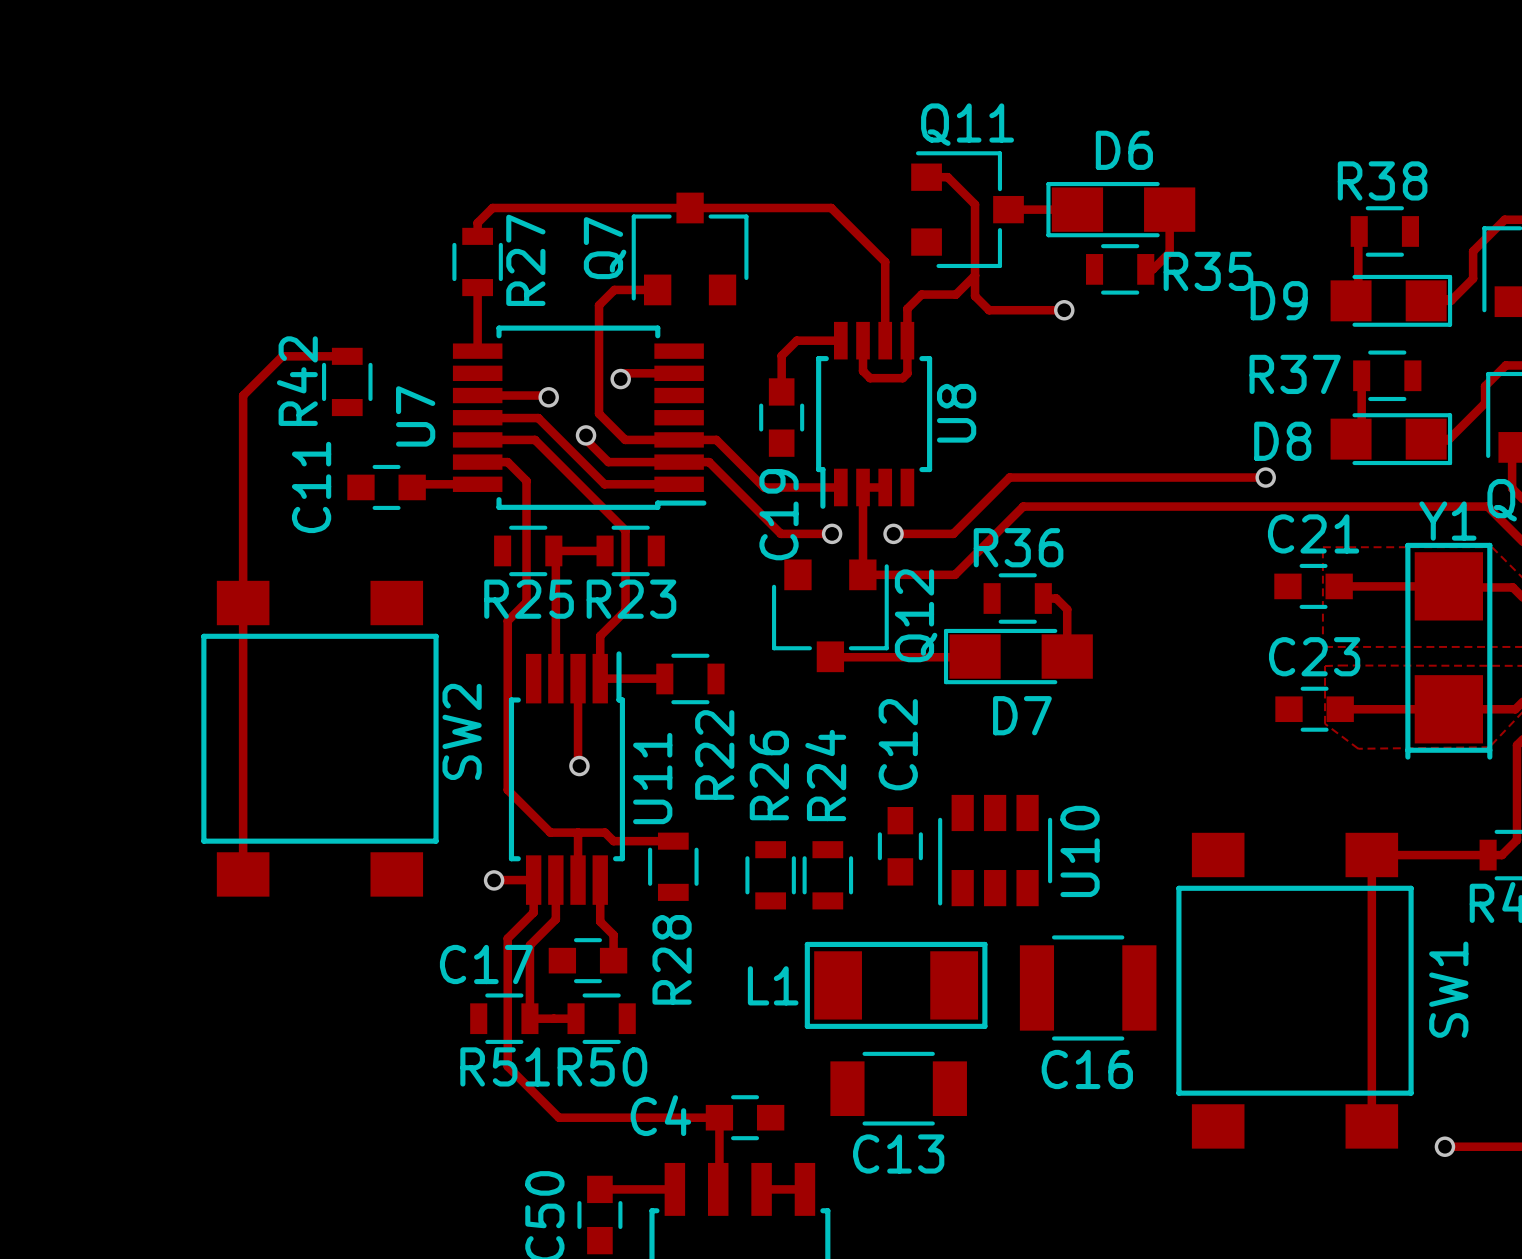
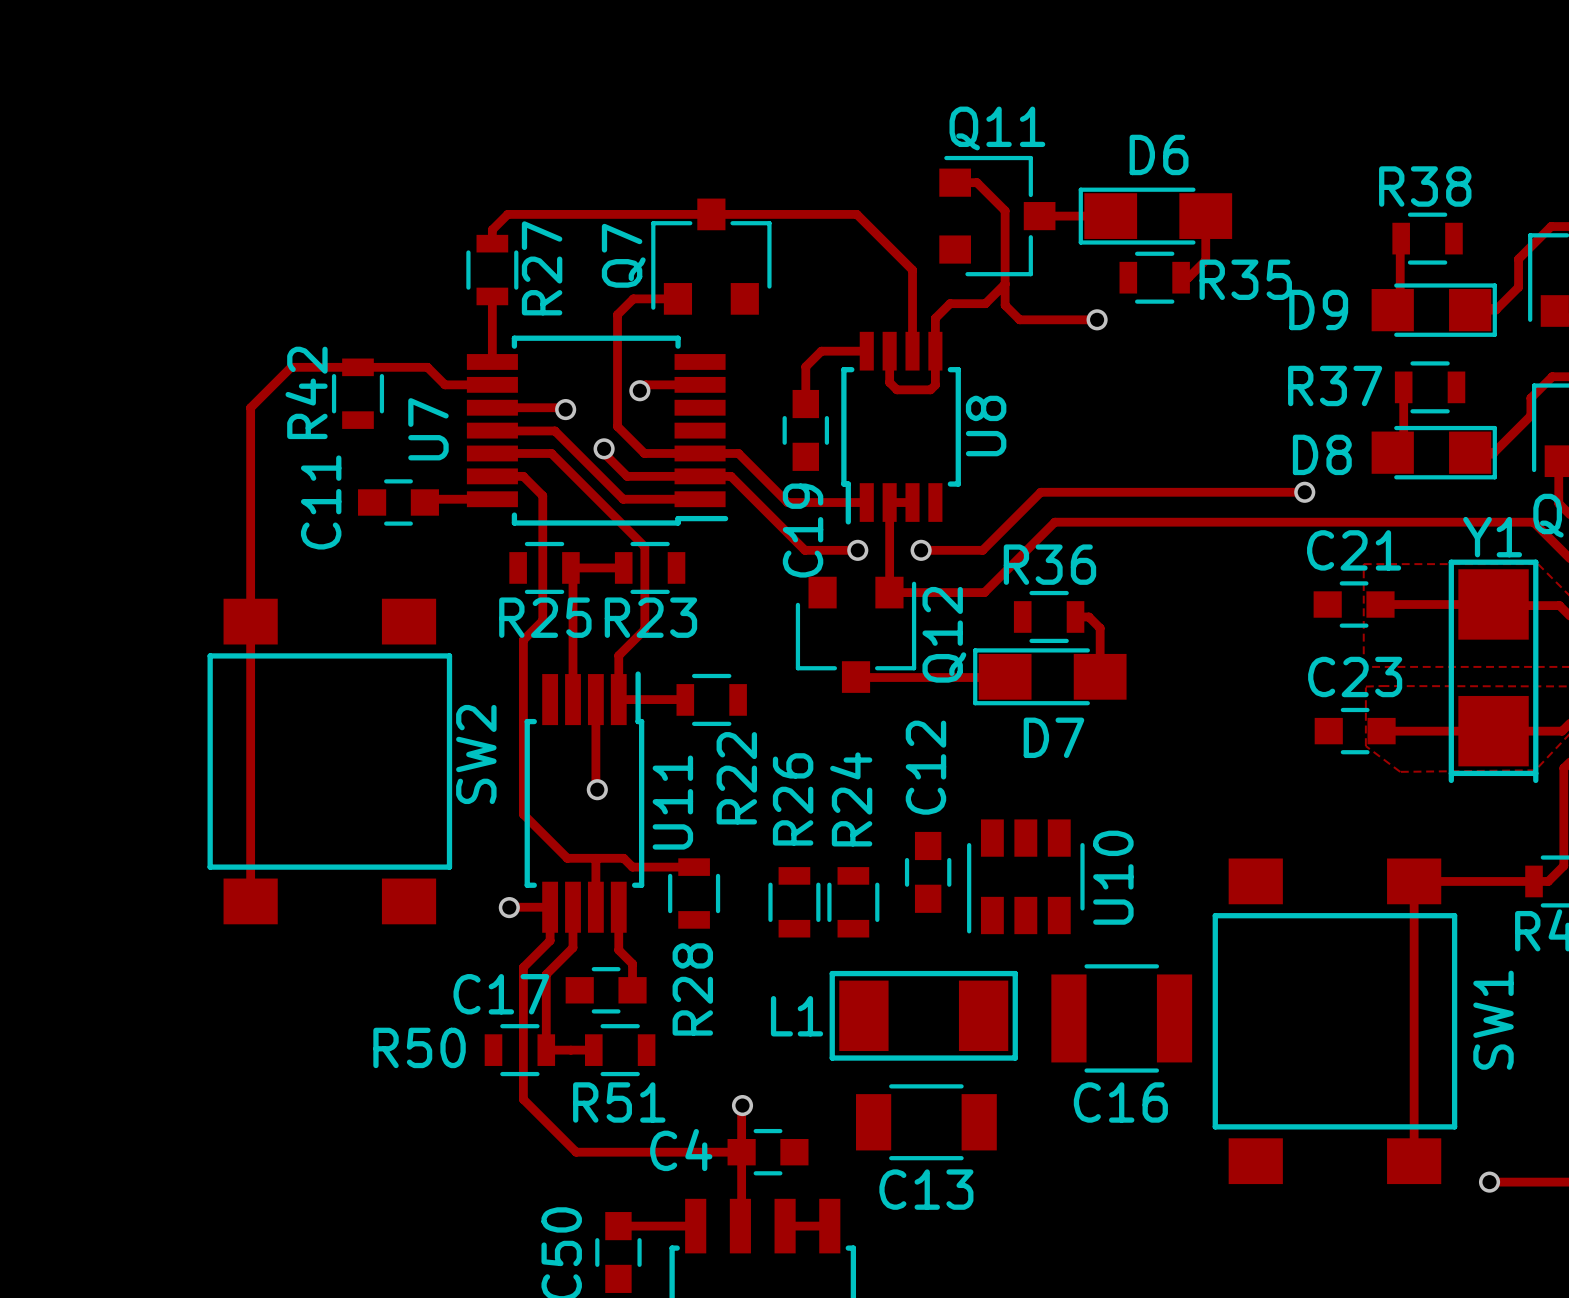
track: none -> (357, 367) (427, 367) (445, 384) (492, 384)
R51 name: R51 (505, 1066) -> R50 (419, 1047)
R50 name: R50 (602, 1066) -> R51 (619, 1102)
track: none -> (742, 1105) (741, 1152)
via: none -> (742, 1105)

